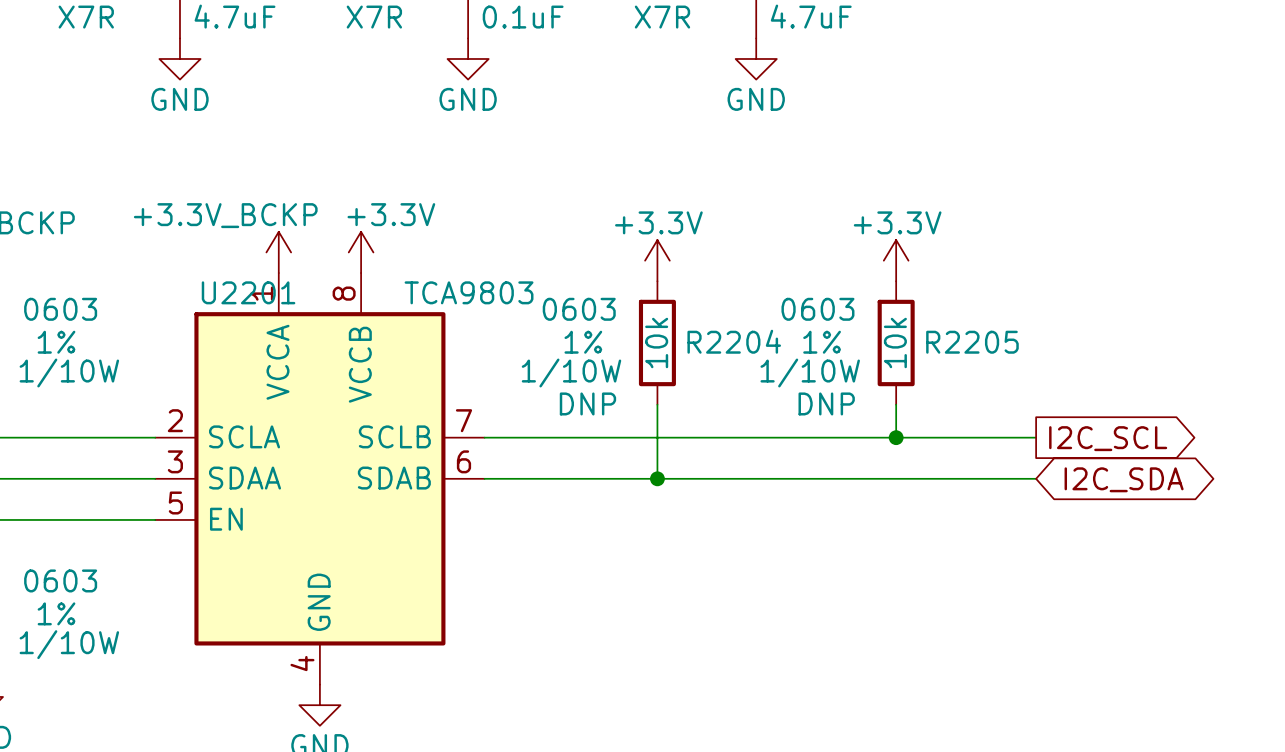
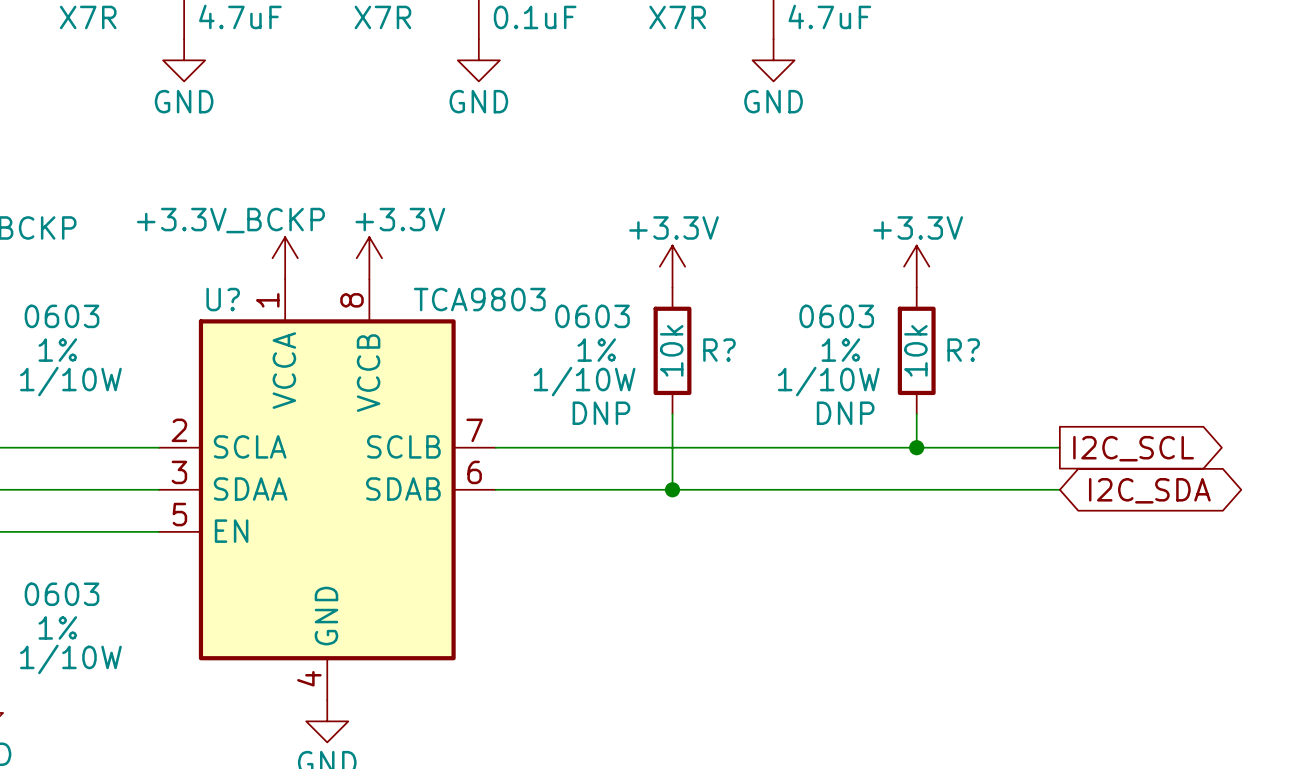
U2201 name: U2201 (248, 292) -> U? (223, 299)
R2204 name: R2204 (734, 341) -> R? (719, 350)
R2205 name: R2205 (972, 342) -> R? (963, 350)

